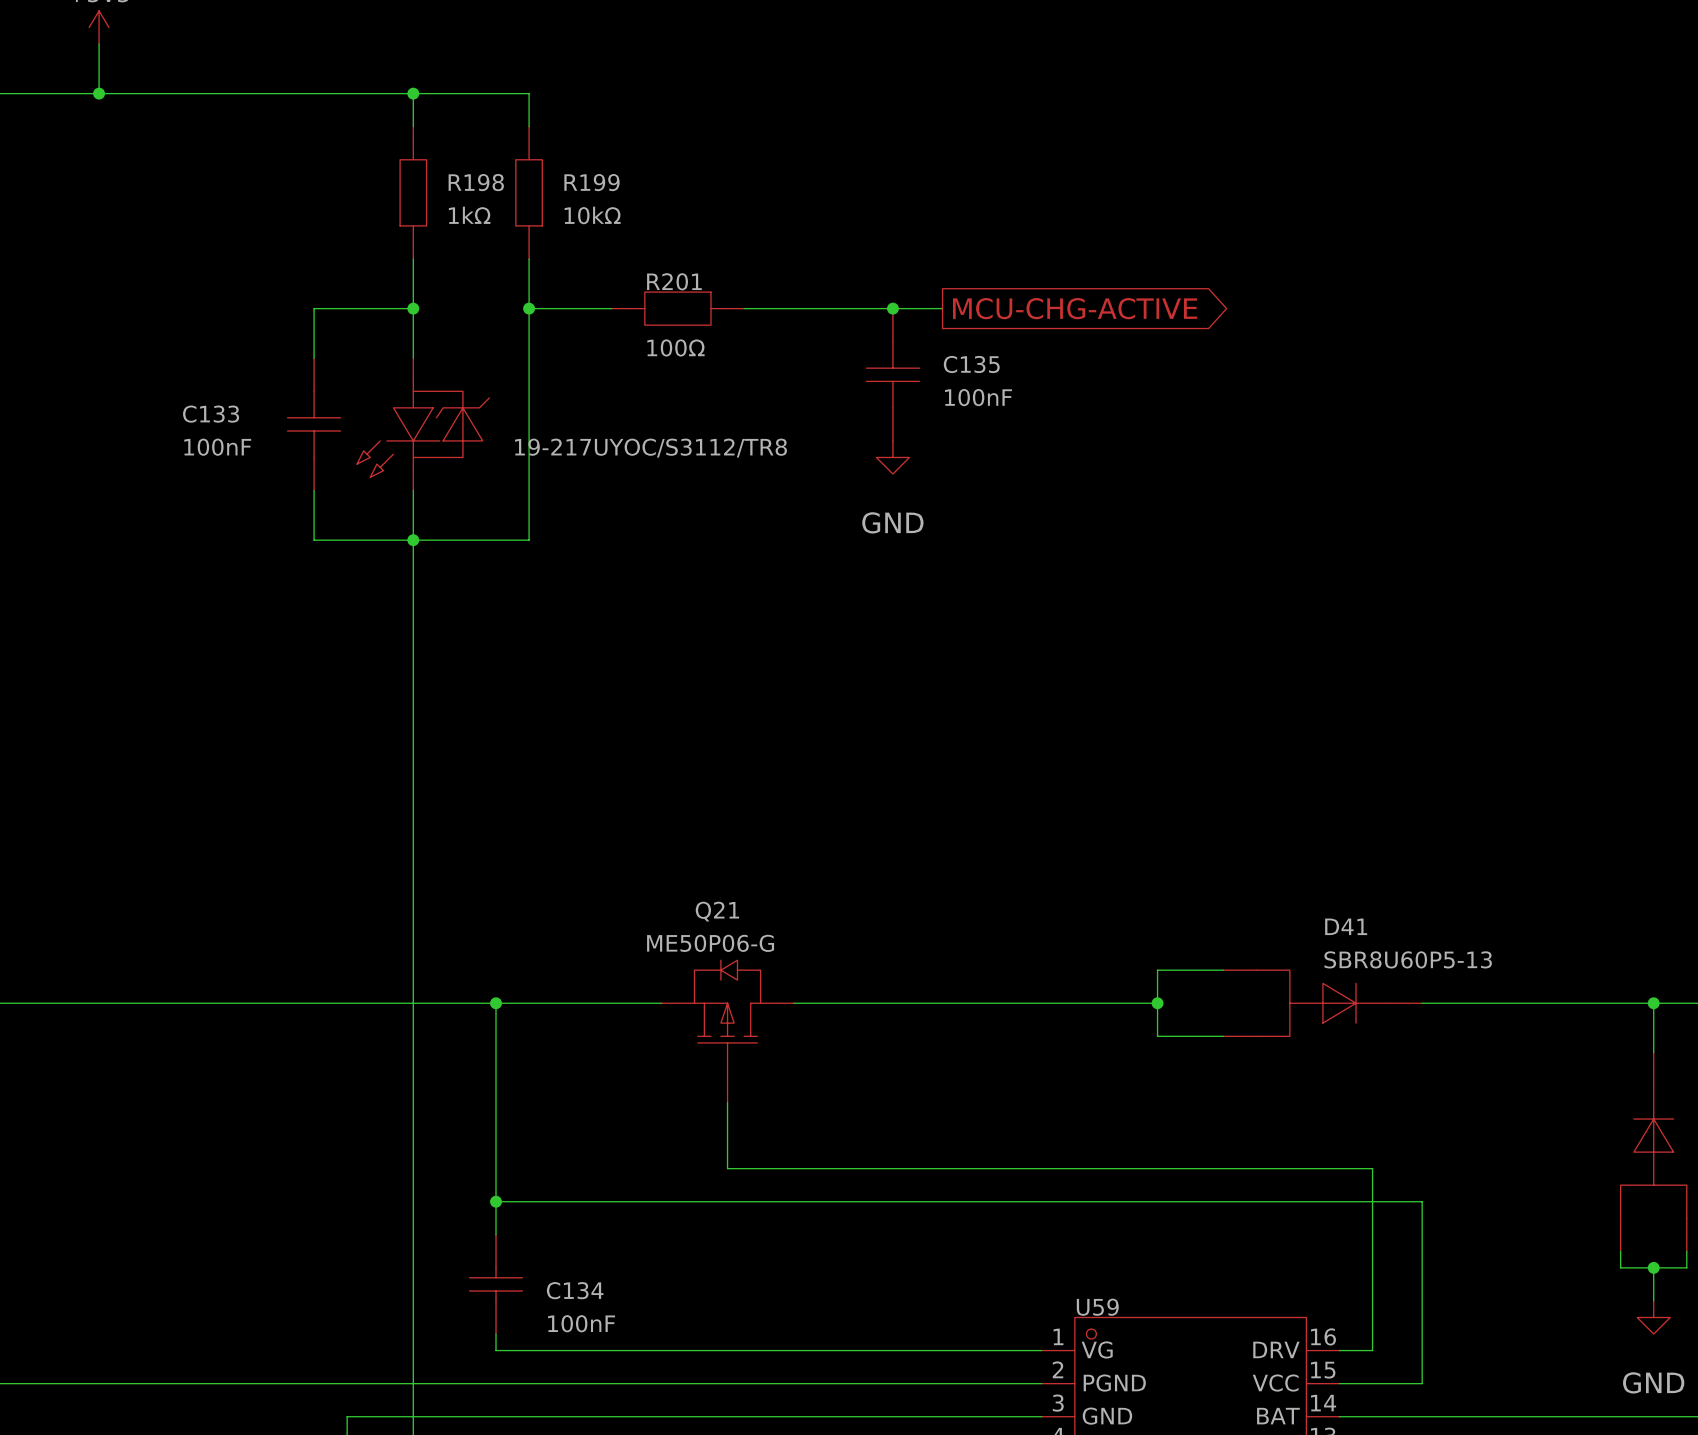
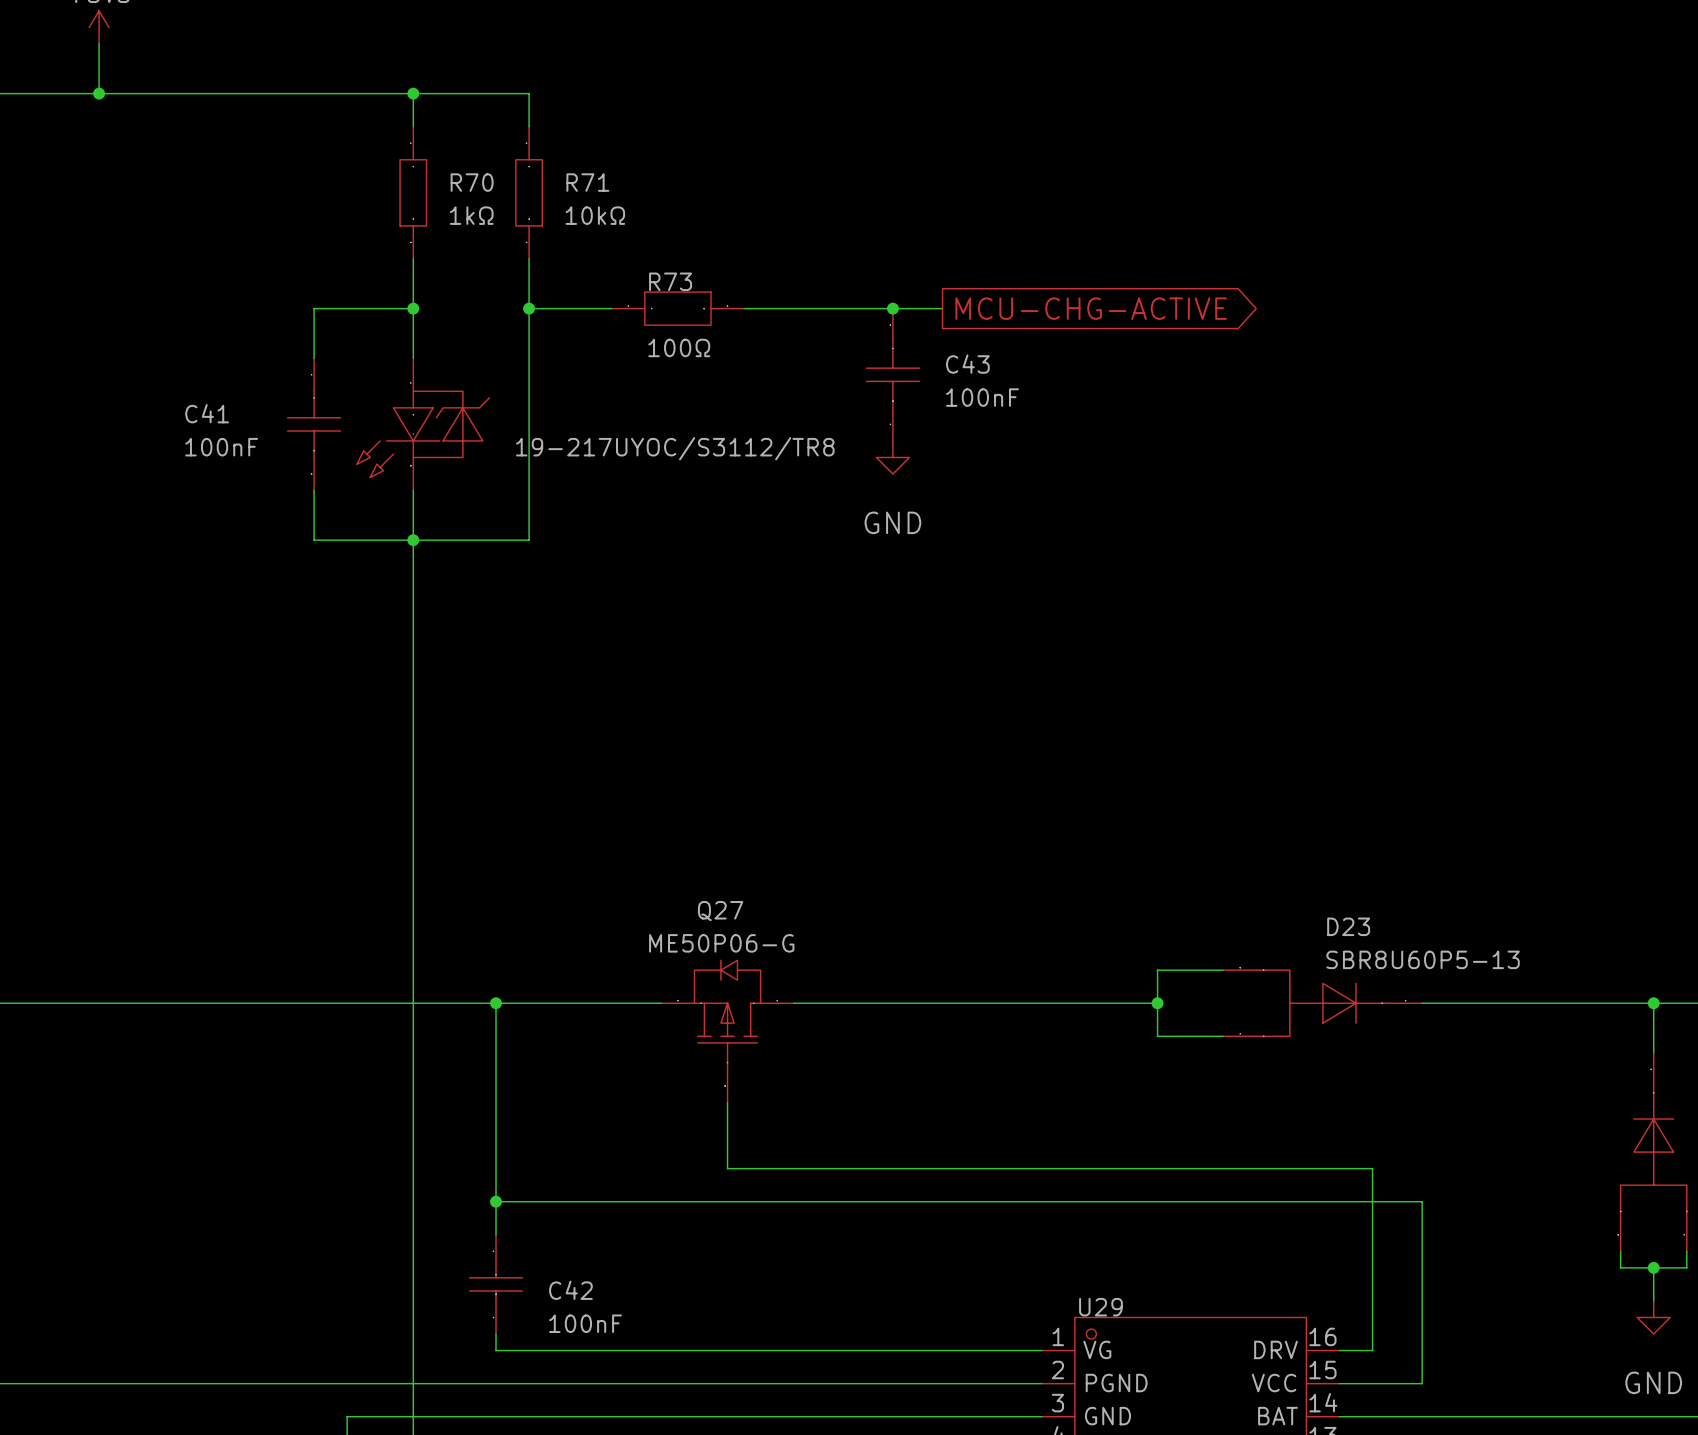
R198 name: R198 (476, 182) -> R70 (472, 182)
R199 name: R199 (592, 182) -> R71 (587, 182)
R201 name: R201 (674, 281) -> R73 (670, 281)
C135 name: C135 (971, 364) -> C43 (967, 364)
C133 name: C133 (211, 414) -> C41 (207, 413)
Q21 name: Q21 (717, 911) -> Q27 (720, 911)
D41 name: D41 (1346, 926) -> D23 (1348, 926)
C134 name: C134 (575, 1290) -> C42 (570, 1290)
U59 name: U59 (1097, 1307) -> U29 (1100, 1307)

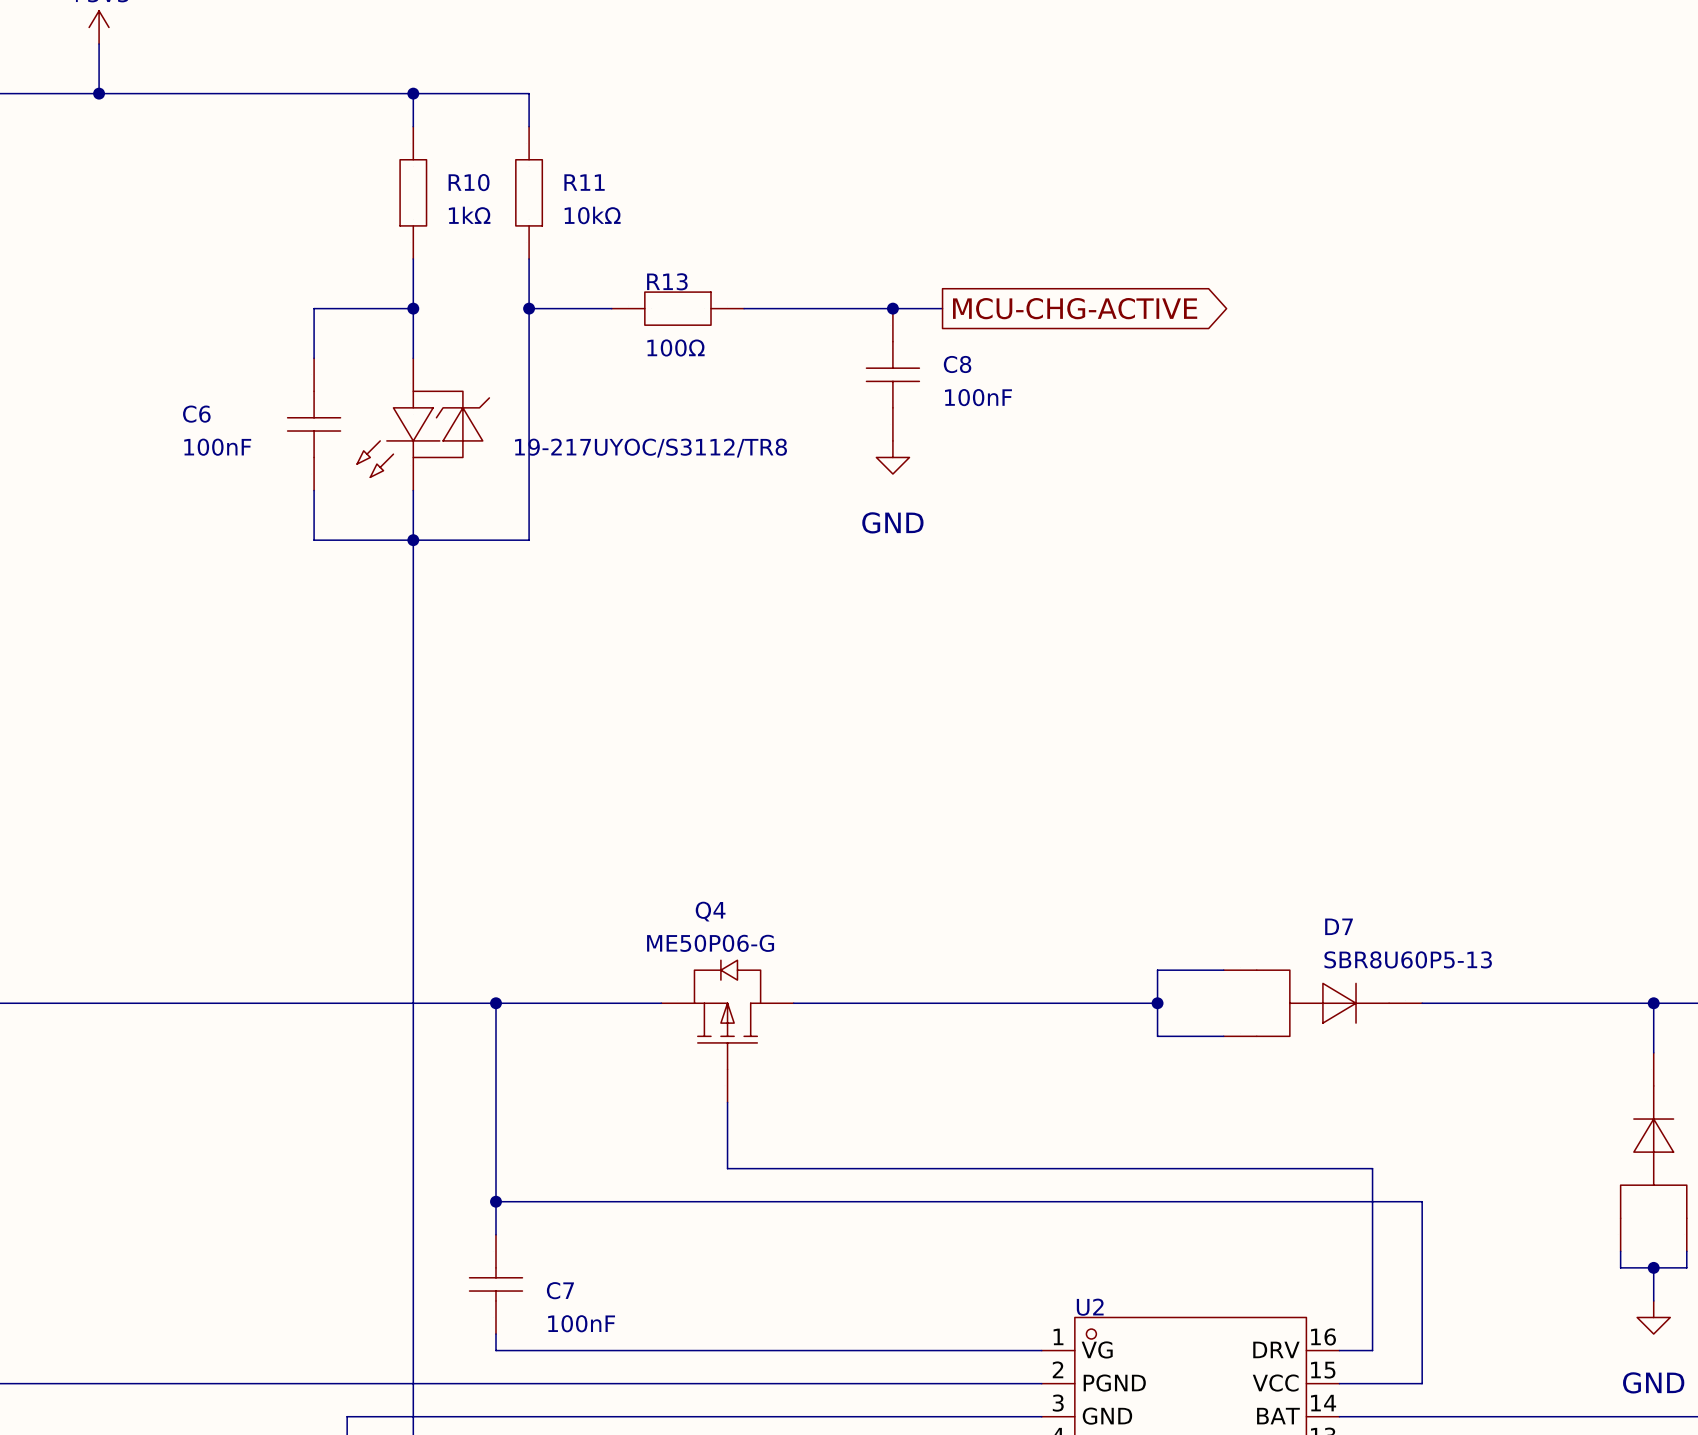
R70 name: R70 (472, 182) -> R10 (469, 182)
R71 name: R71 (587, 182) -> R11 (584, 182)
R73 name: R73 (670, 281) -> R13 (667, 281)
C43 name: C43 (967, 364) -> C8 (957, 364)
C41 name: C41 (207, 413) -> C6 (196, 414)
Q27 name: Q27 (720, 911) -> Q4 (710, 911)
D23 name: D23 (1348, 926) -> D7 (1339, 926)
C42 name: C42 (570, 1290) -> C7 (560, 1290)
U29 name: U29 (1100, 1307) -> U2 (1090, 1307)

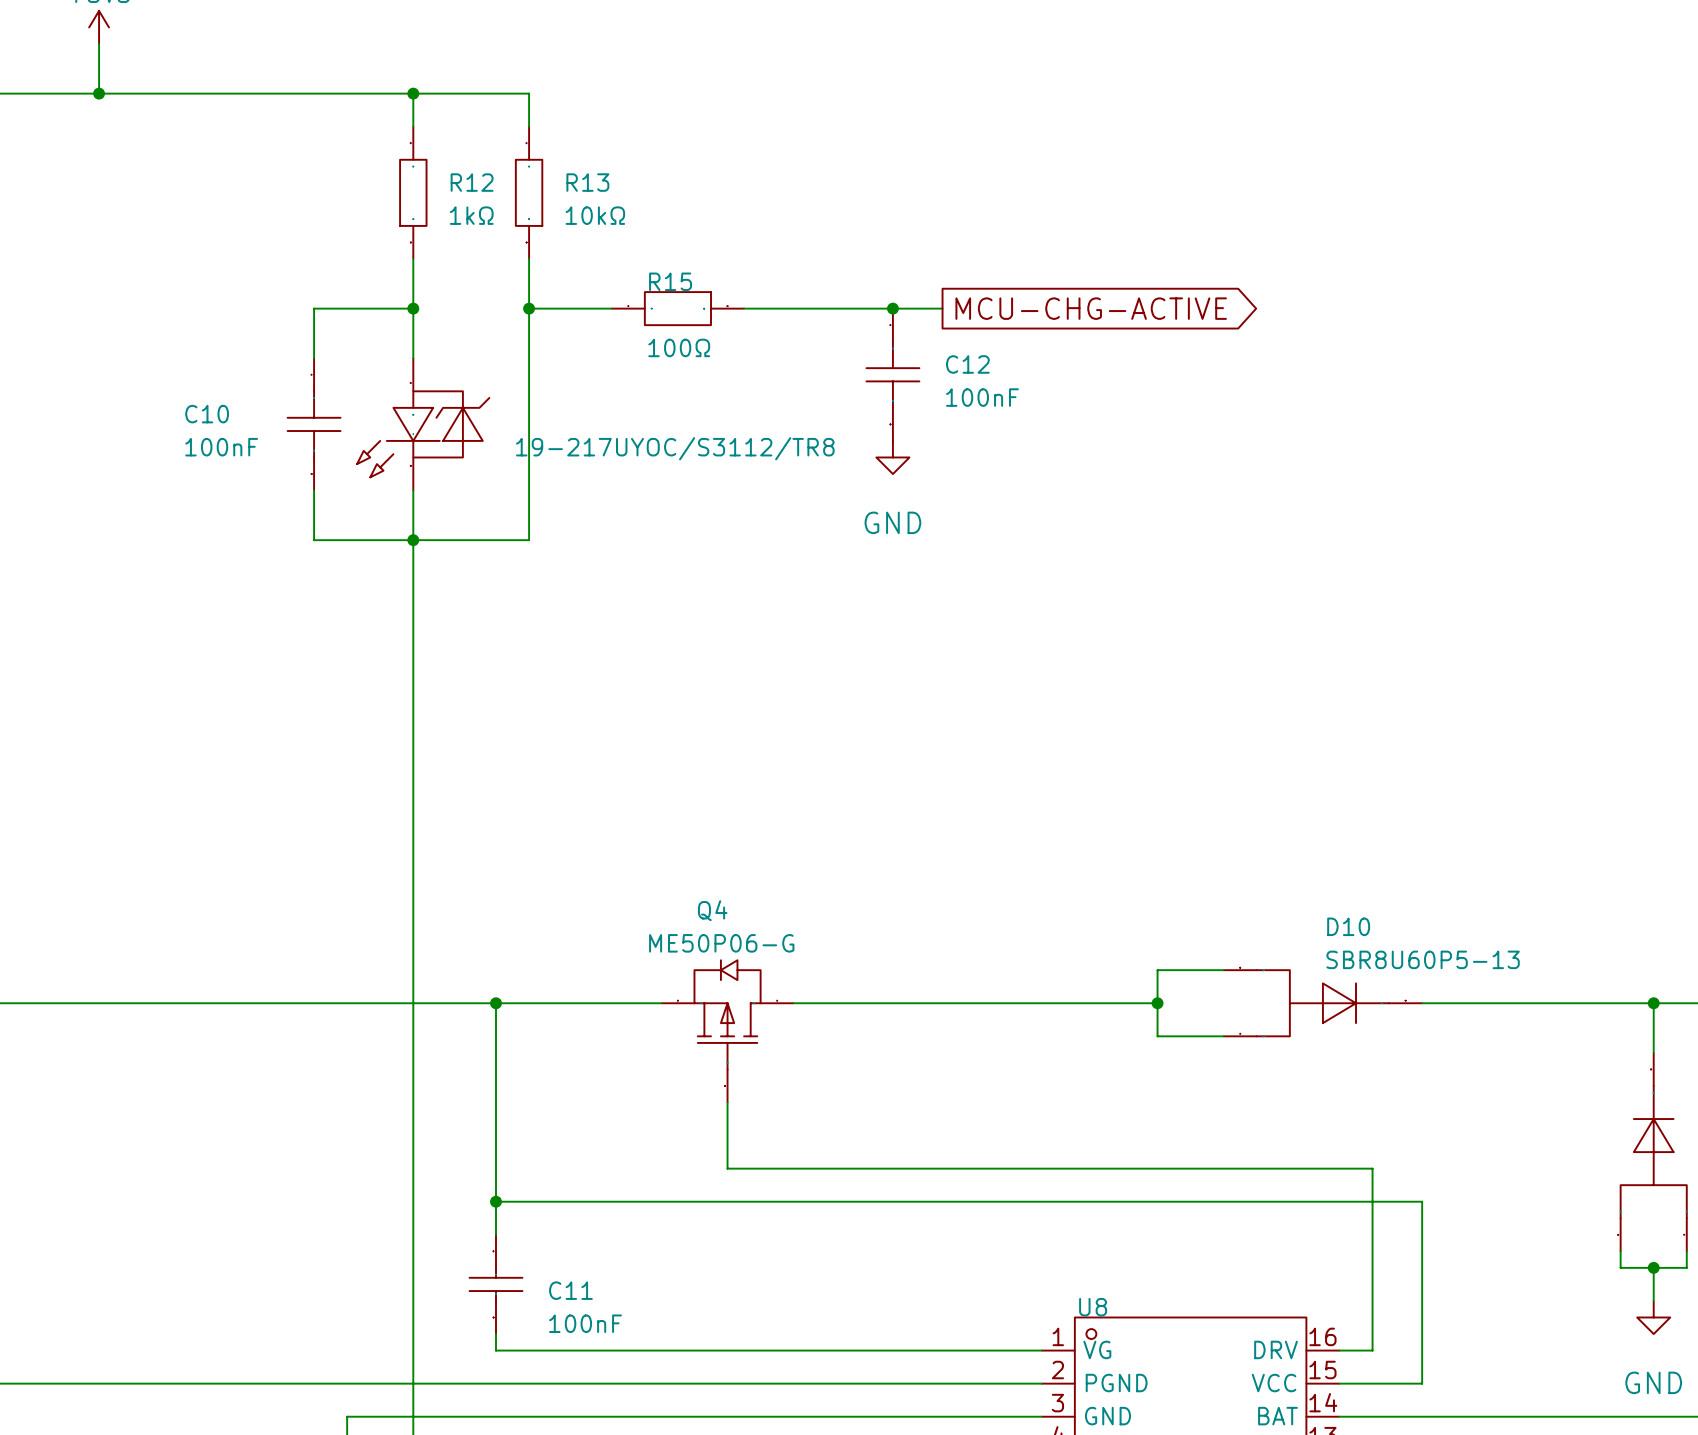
R10 name: R10 (469, 182) -> R12 (472, 182)
R11 name: R11 (584, 182) -> R13 (587, 182)
R13 name: R13 (667, 281) -> R15 (670, 281)
C8 name: C8 (957, 364) -> C12 (967, 364)
C6 name: C6 (196, 414) -> C10 (207, 414)
D7 name: D7 (1339, 926) -> D10 (1348, 926)
C7 name: C7 (560, 1290) -> C11 (570, 1290)
U2 name: U2 (1090, 1307) -> U8 (1093, 1307)

